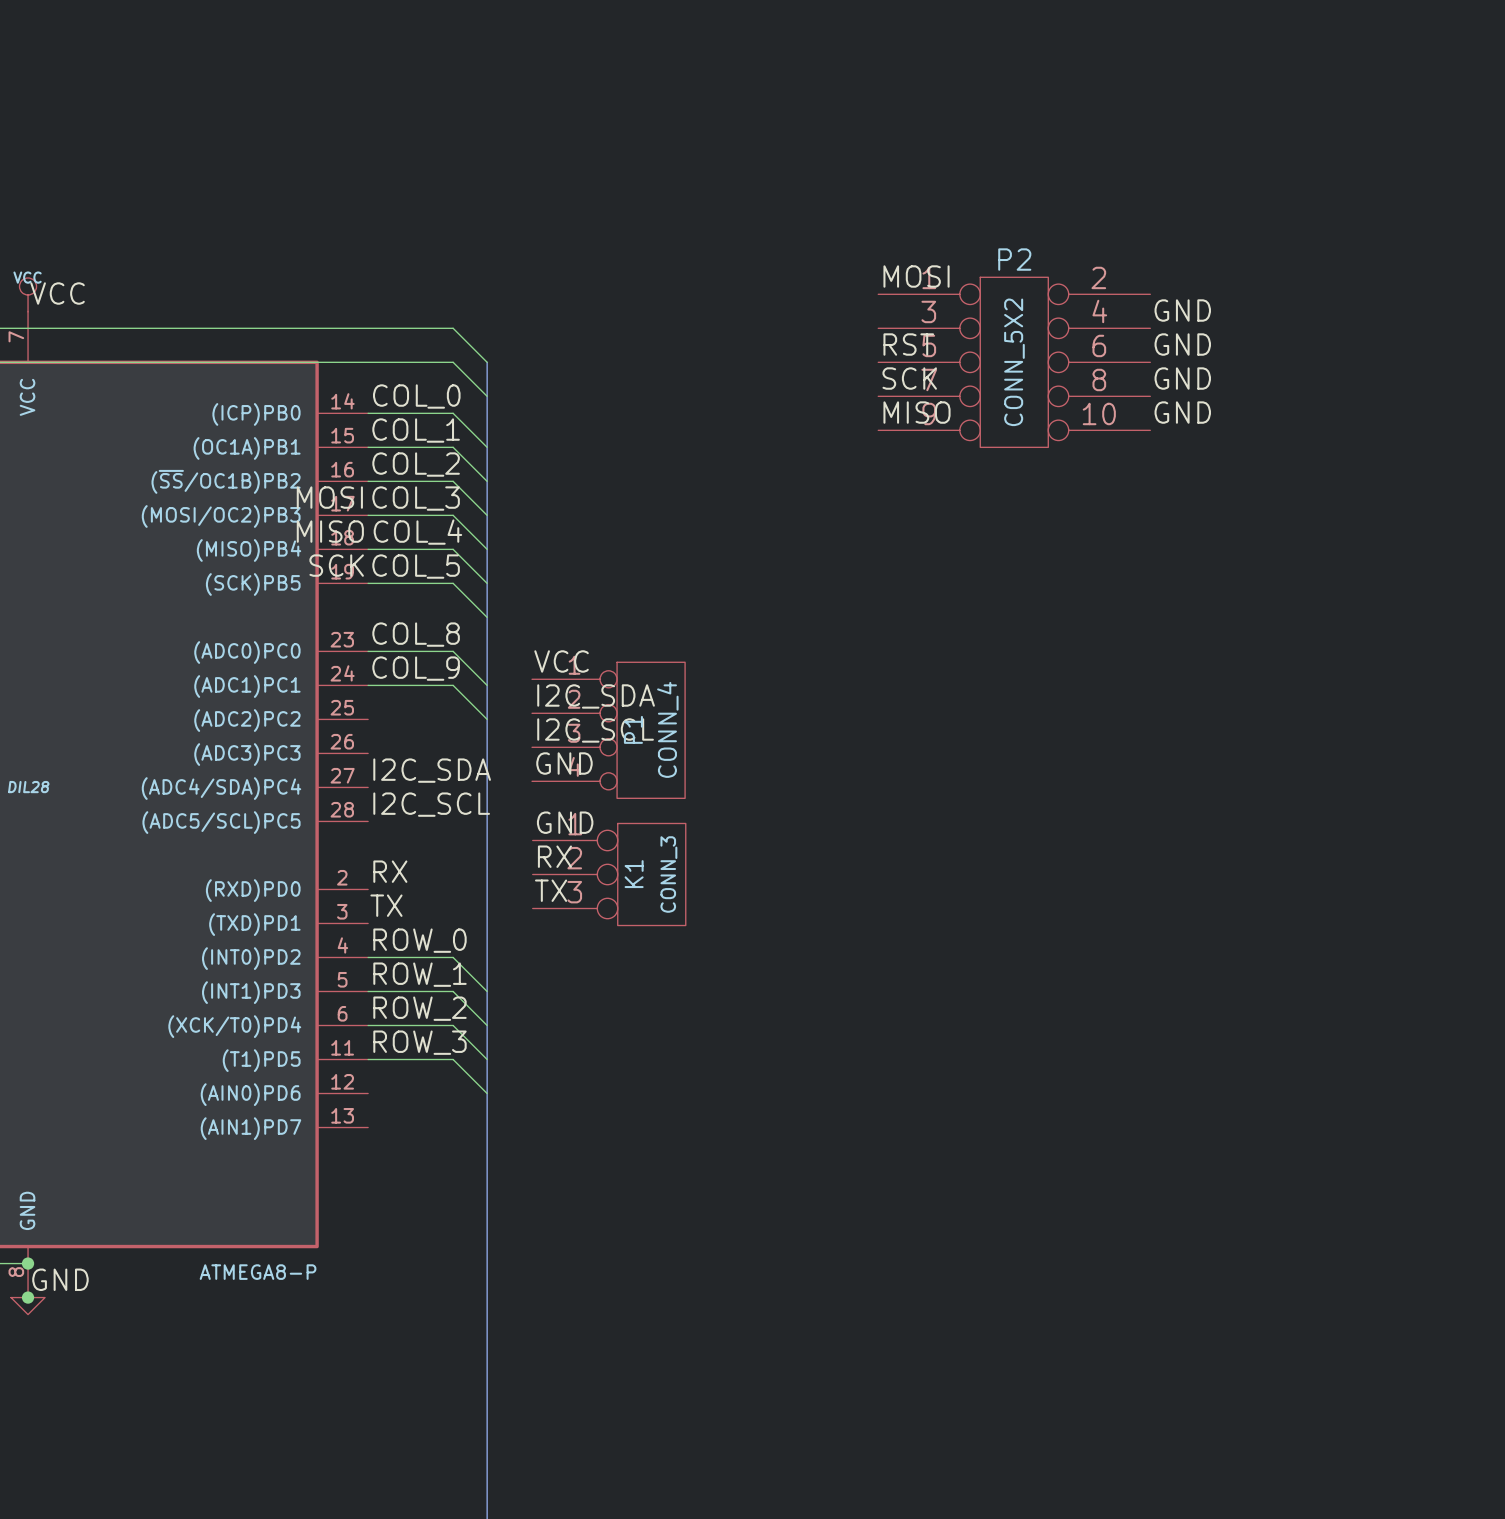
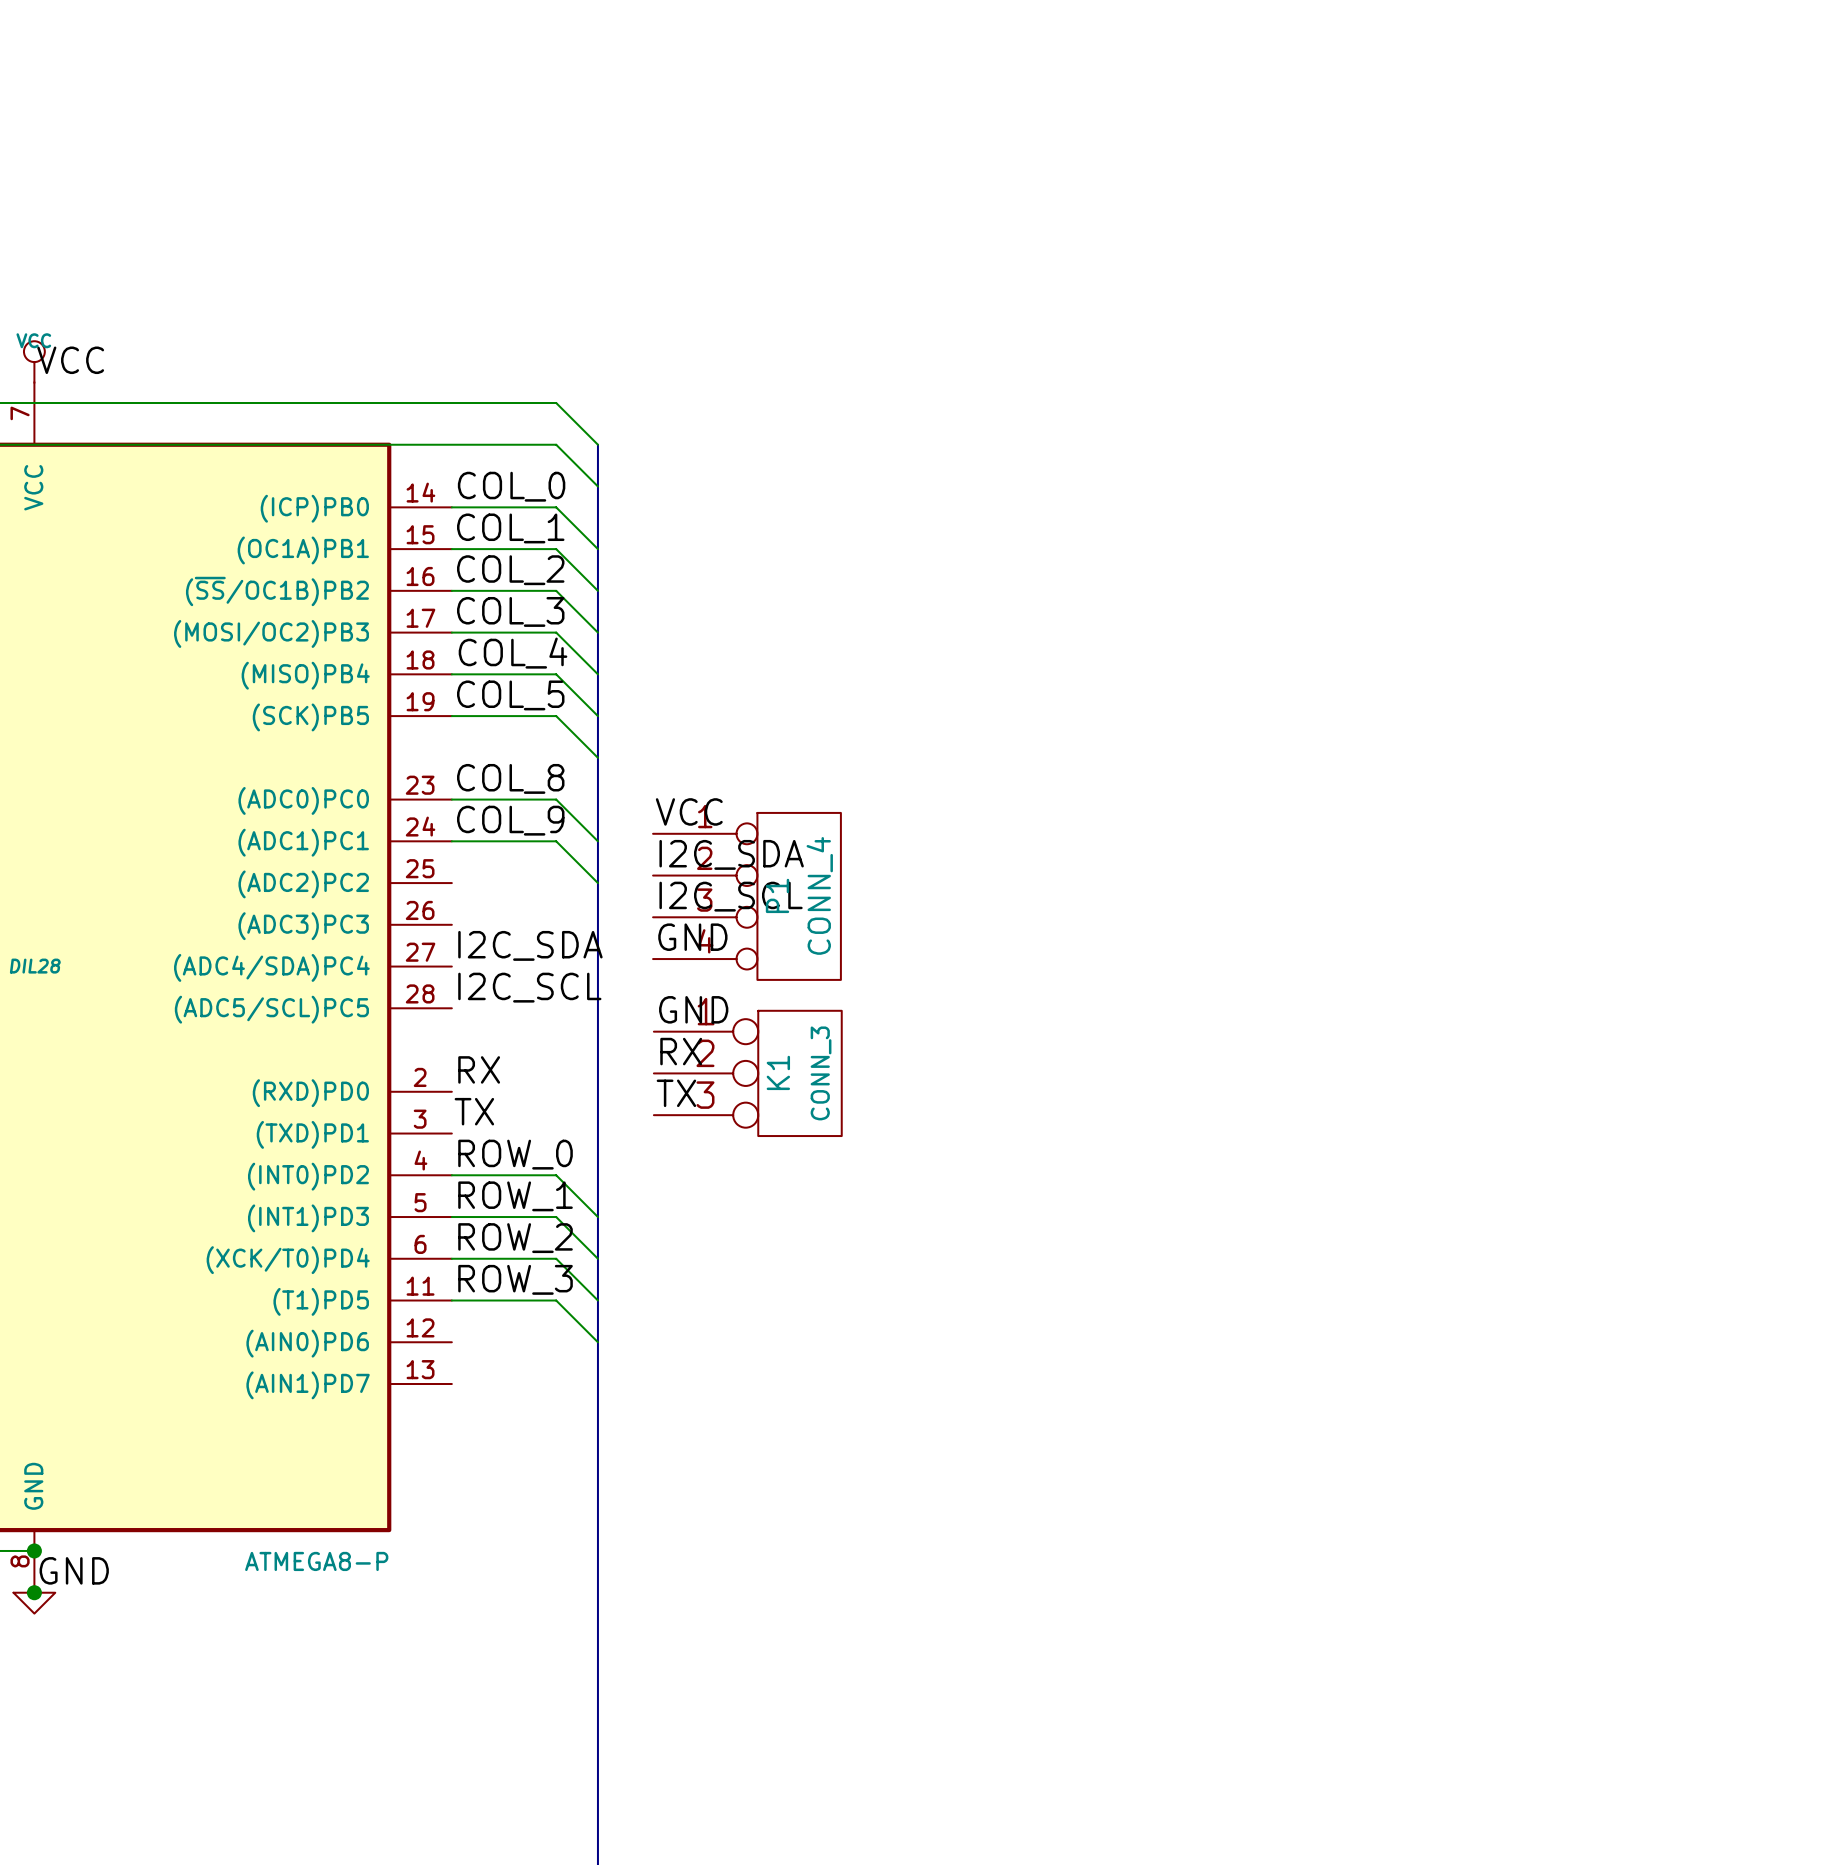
label: MOSI (916, 276) -> none
label: GND (1182, 310) -> none
label: RST (908, 344) -> none
label: GND (1182, 344) -> none
P2: CONN_5X2 (1014, 362) -> none
label: SCK (909, 378) -> none
label: GND (1182, 378) -> none
label: MISO (917, 412) -> none
label: GND (1182, 412) -> none
label: MOSI (329, 497) -> none
label: MISO (330, 531) -> none
label: SCK (336, 565) -> none

